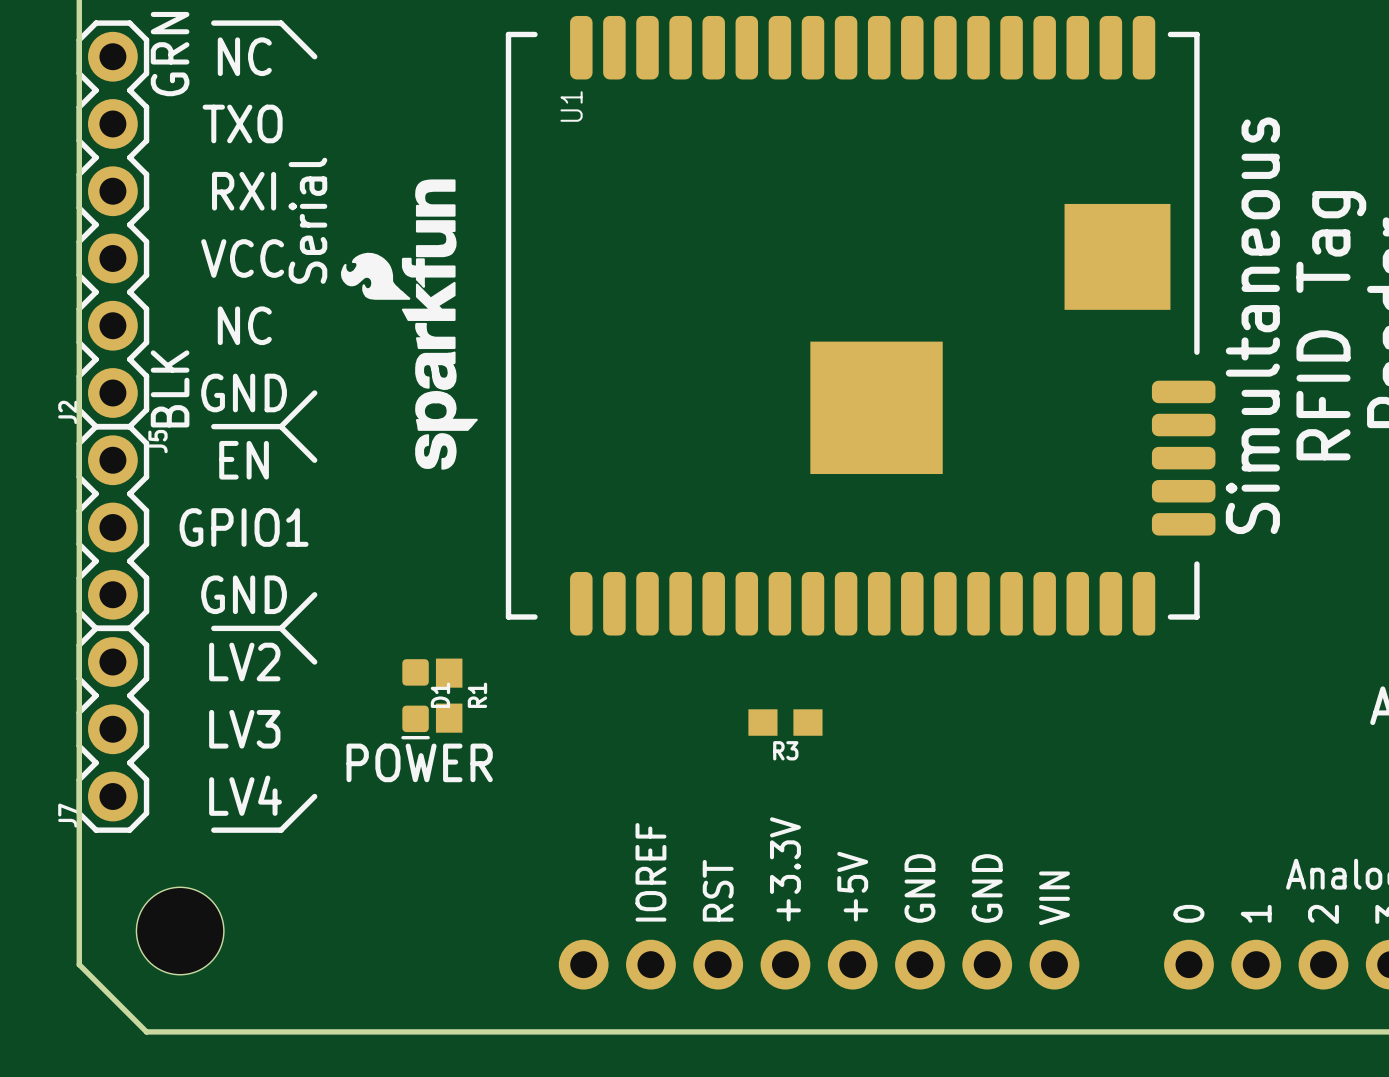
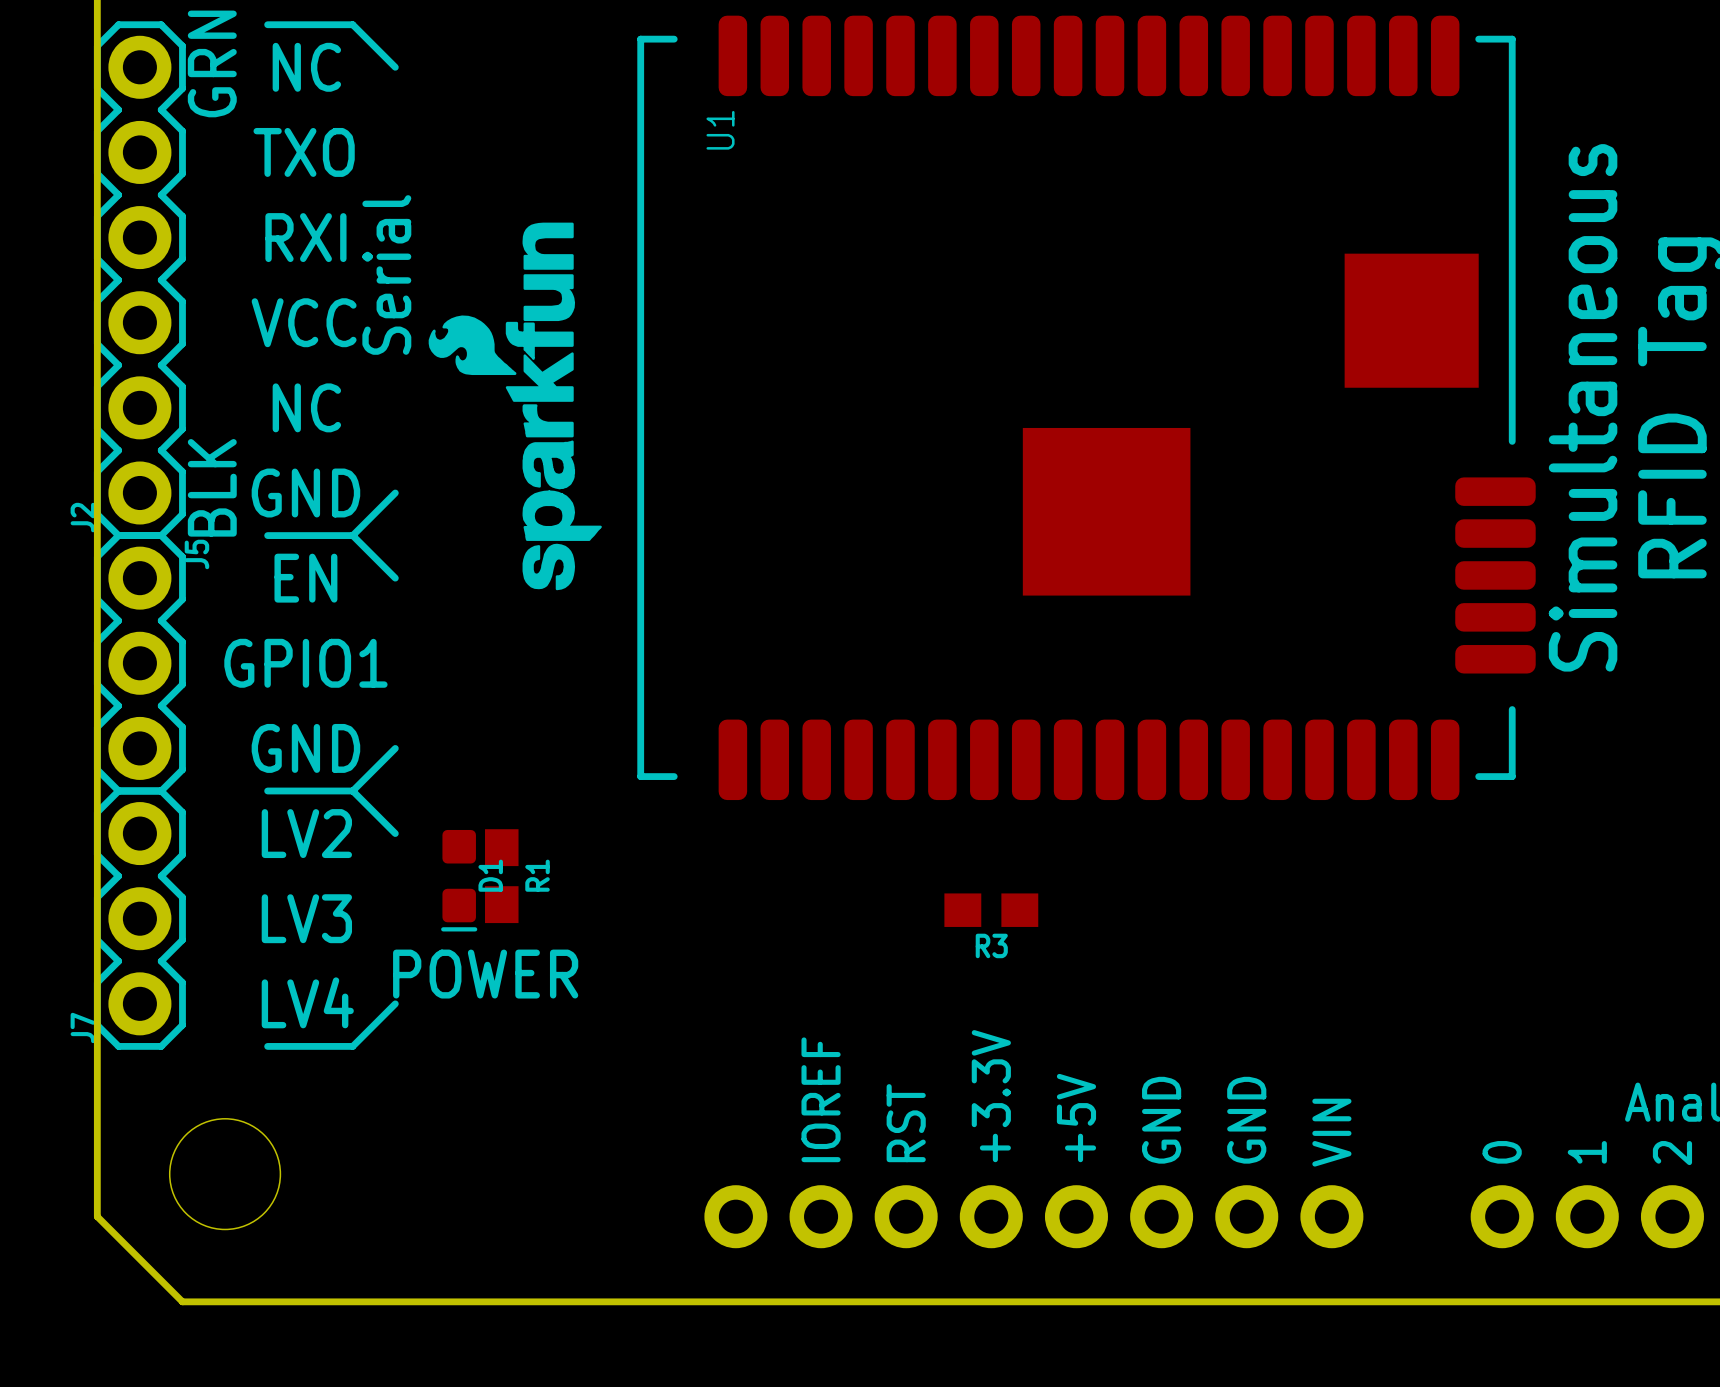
R1 position: (449, 695) -> (501, 876)
D1 position: (415, 699) -> (459, 880)
text position: POWER (419, 762) -> POWER (485, 974)

